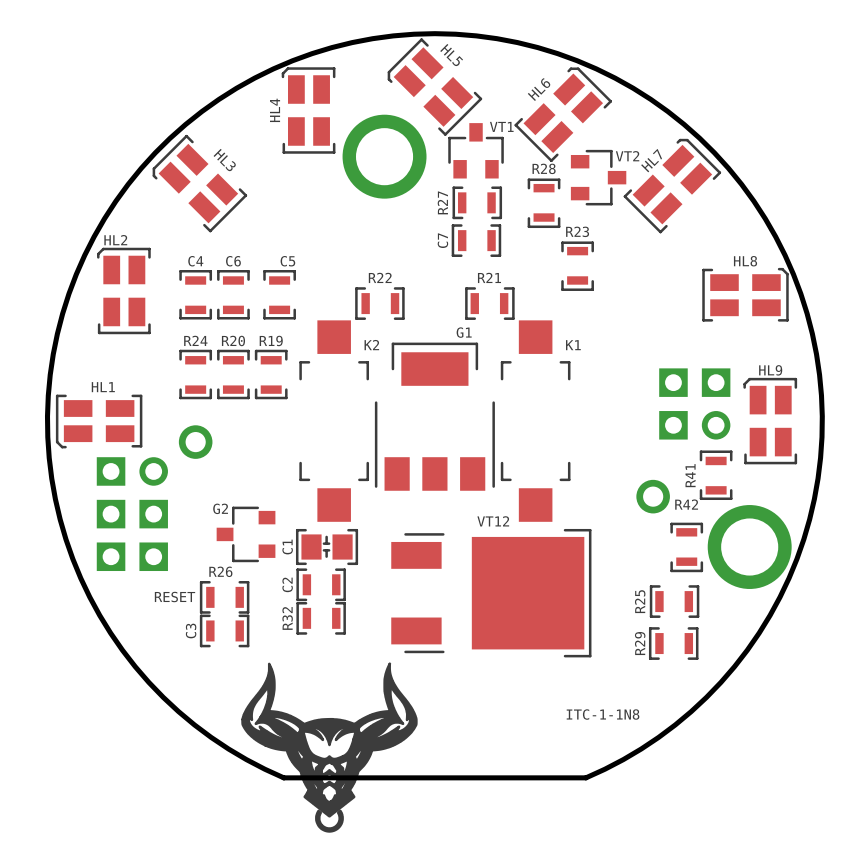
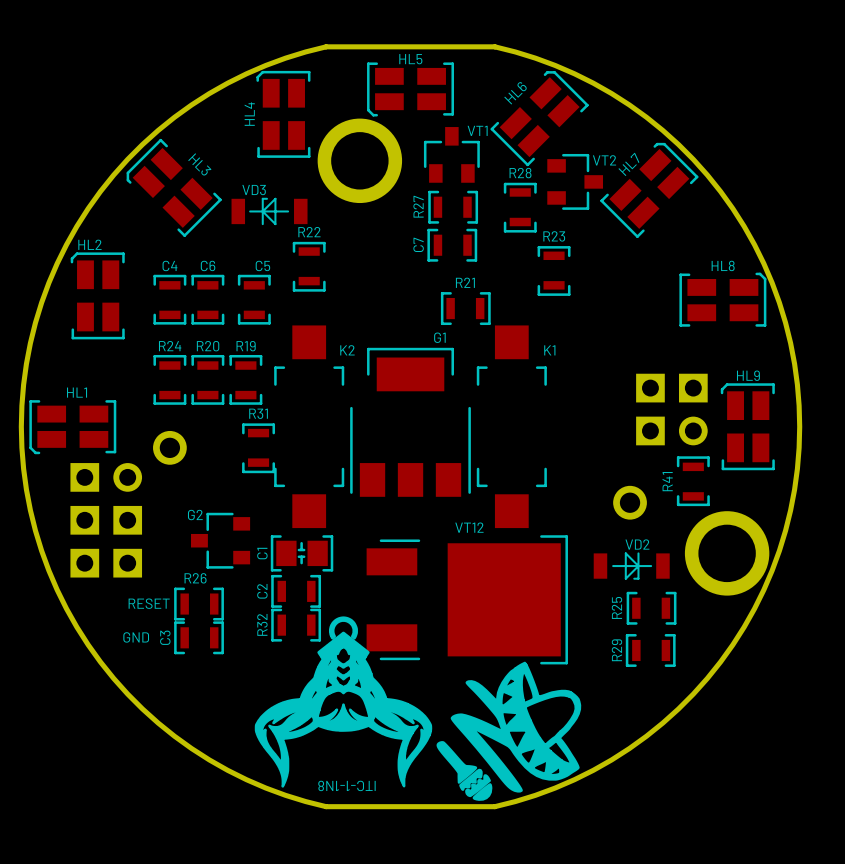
HL5 rotation: 0° (434, 87) -> 45° counterclockwise (410, 89)
VD3: none -> (269, 211)
R22 rotation: 0° (379, 303) -> 90° counterclockwise (309, 266)
R22 position: (379, 303) -> (309, 266)
R31: none -> (258, 448)
R42: (686, 547) -> none
VD2: none -> (631, 566)
drawing: none -> [254, 616, 582, 801]
text: none -> GND (136, 637)
drawing: [241, 662, 418, 833] -> none
text rotation: 0° (603, 714) -> 180° (346, 785)
text position: ITC-1-1N8 (603, 714) -> ITC-1-1N8 (346, 785)
board edge: (283, 777) (586, 777) (623, 759) (658, 737) (691, 711) (720, 682) (759, 633) (780, 597) (796, 559) (814, 499) (820, 457) (822, 416) (819, 374) (812, 333) (793, 274) (775, 236) (753, 201) (714, 152) (684, 124) (650, 99) (615, 78) (577, 60) (517, 42) (476, 35) (434, 33) (393, 35) (352, 42) (312, 53) (273, 68) (236, 88) (201, 111) (155, 152) (128, 184) (104, 218) (76, 274) (62, 313) (53, 354) (48, 395) (47, 437) (55, 499) (65, 539) (80, 578) (110, 633) (135, 666) (163, 697) (194, 724) (228, 748) (246, 759) (264, 769) (283, 777) -> (326, 46) (494, 46) (555, 65) (611, 93) (646, 117) (678, 144) (707, 175) (732, 208) (763, 263) (779, 302) (790, 343) (797, 384) (799, 426) (794, 489) (785, 530) (772, 570) (754, 608) (732, 644) (707, 678) (678, 708) (629, 748) (574, 779) (535, 795) (494, 806) (326, 806) (265, 788) (209, 759) (174, 736) (142, 708) (113, 678) (88, 644) (57, 589) (41, 550) (30, 510) (23, 468) (21, 426) (26, 363) (35, 322) (48, 282) (66, 244) (88, 208) (113, 175) (142, 144) (191, 104) (246, 73) (285, 58) (326, 46)

